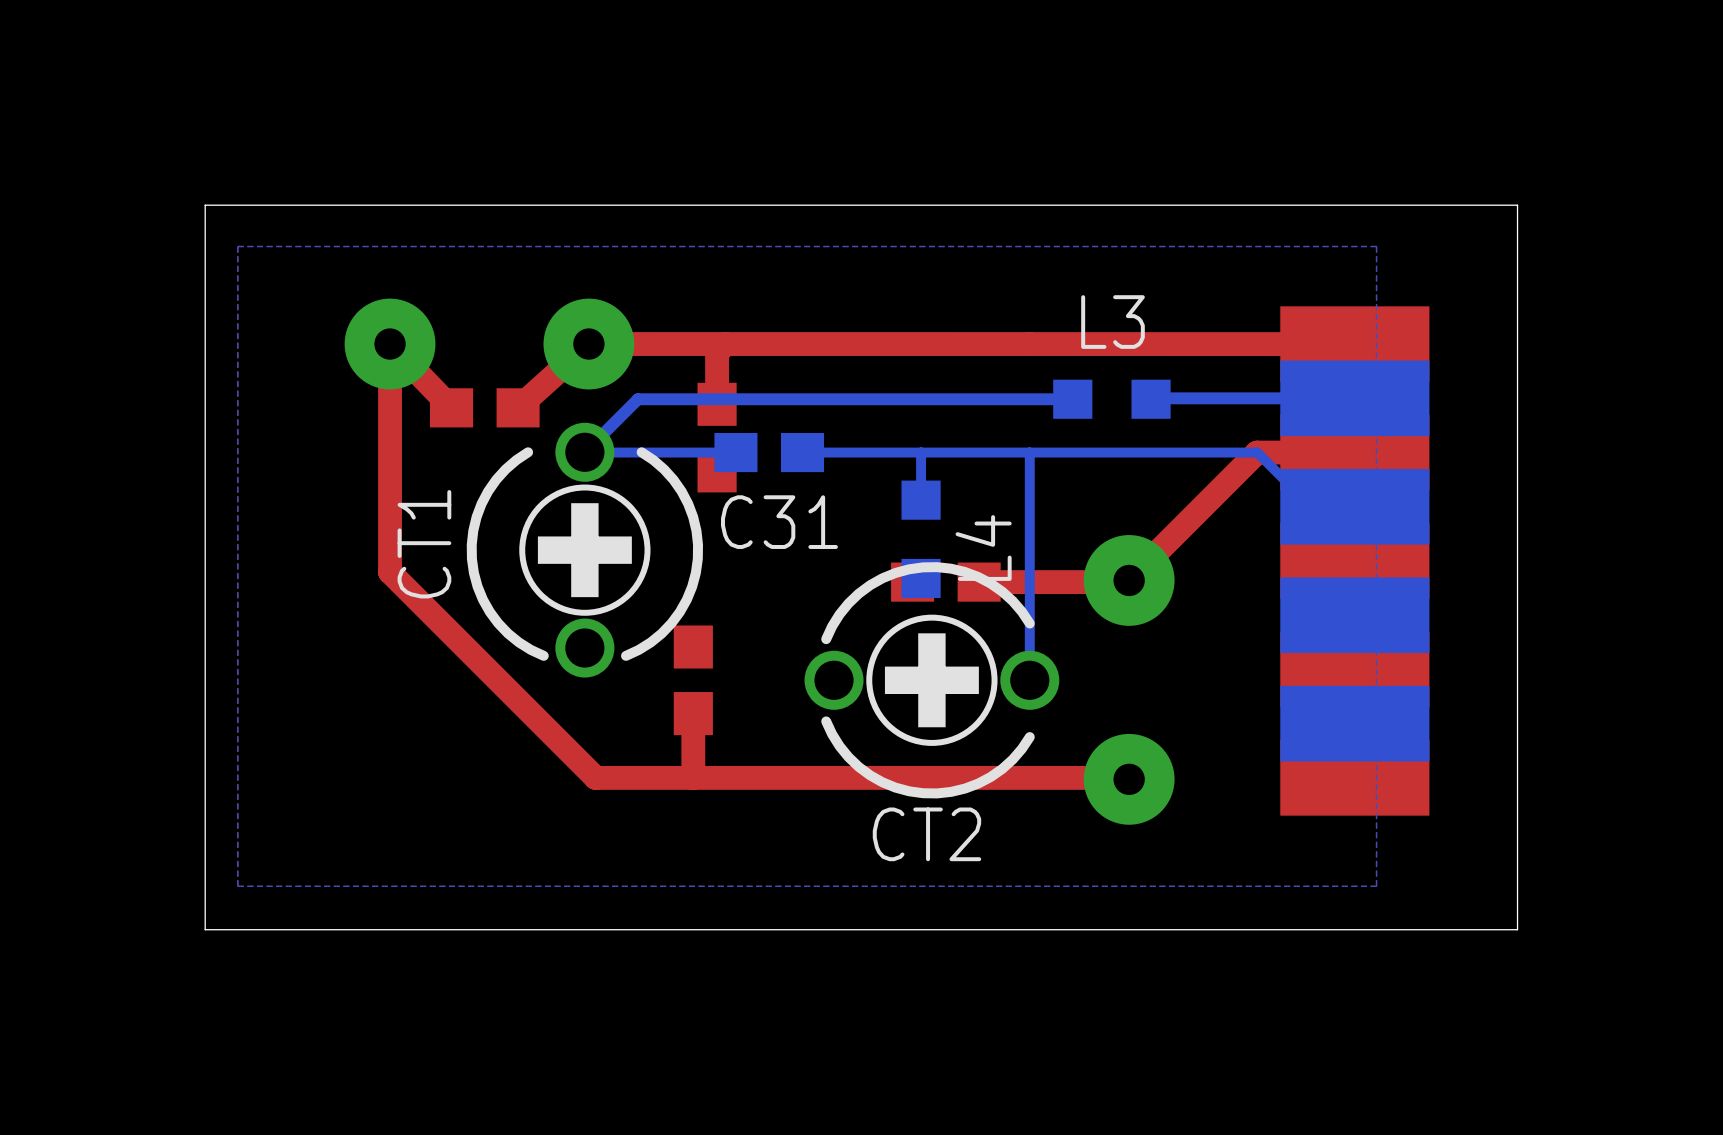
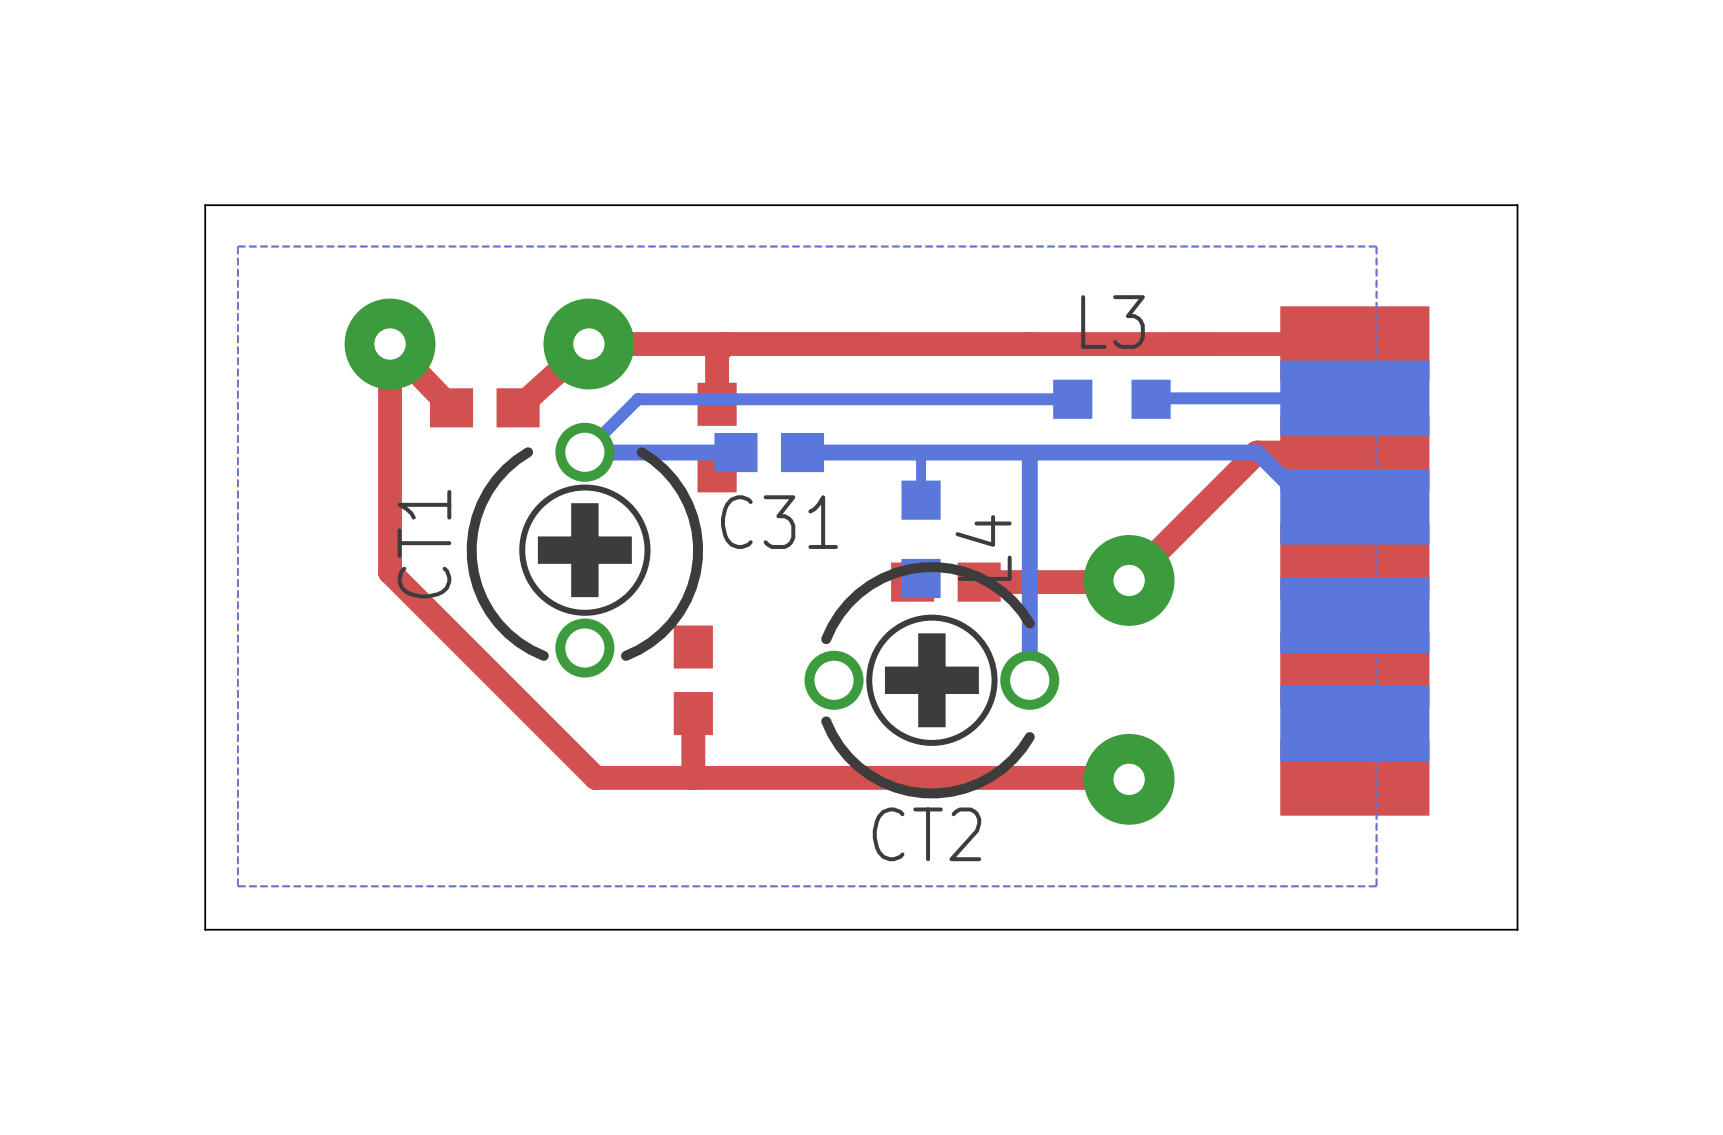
bottom track width: thin (735, 452) (585, 452) -> thick (735, 452) (585, 452)
bottom track width: thin (802, 452) (1257, 452) (1311, 506) -> thick (802, 452) (1257, 452) (1311, 506)
bottom track width: thin (1029, 452) (1029, 680) -> thick (1029, 452) (1029, 680)

